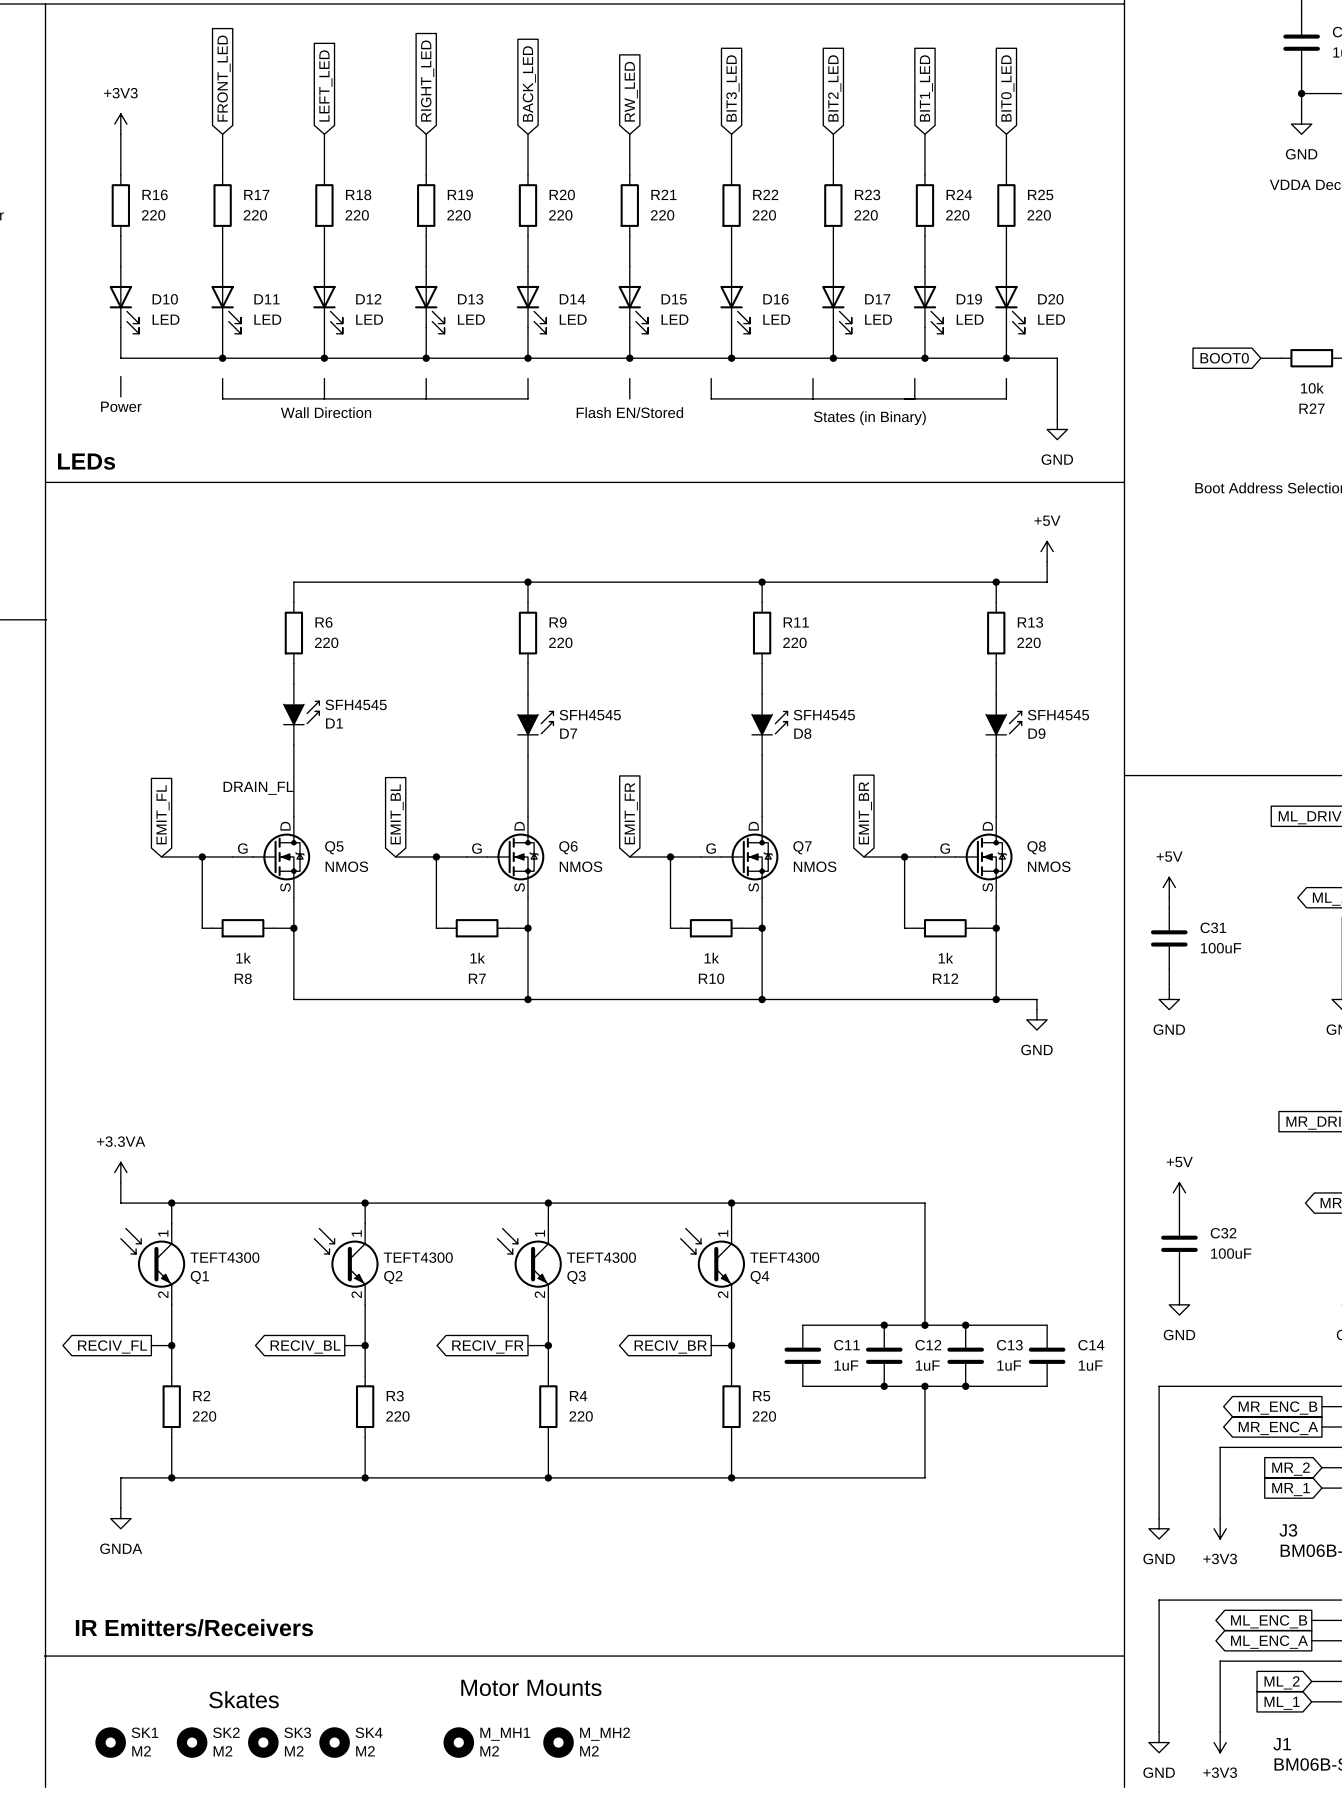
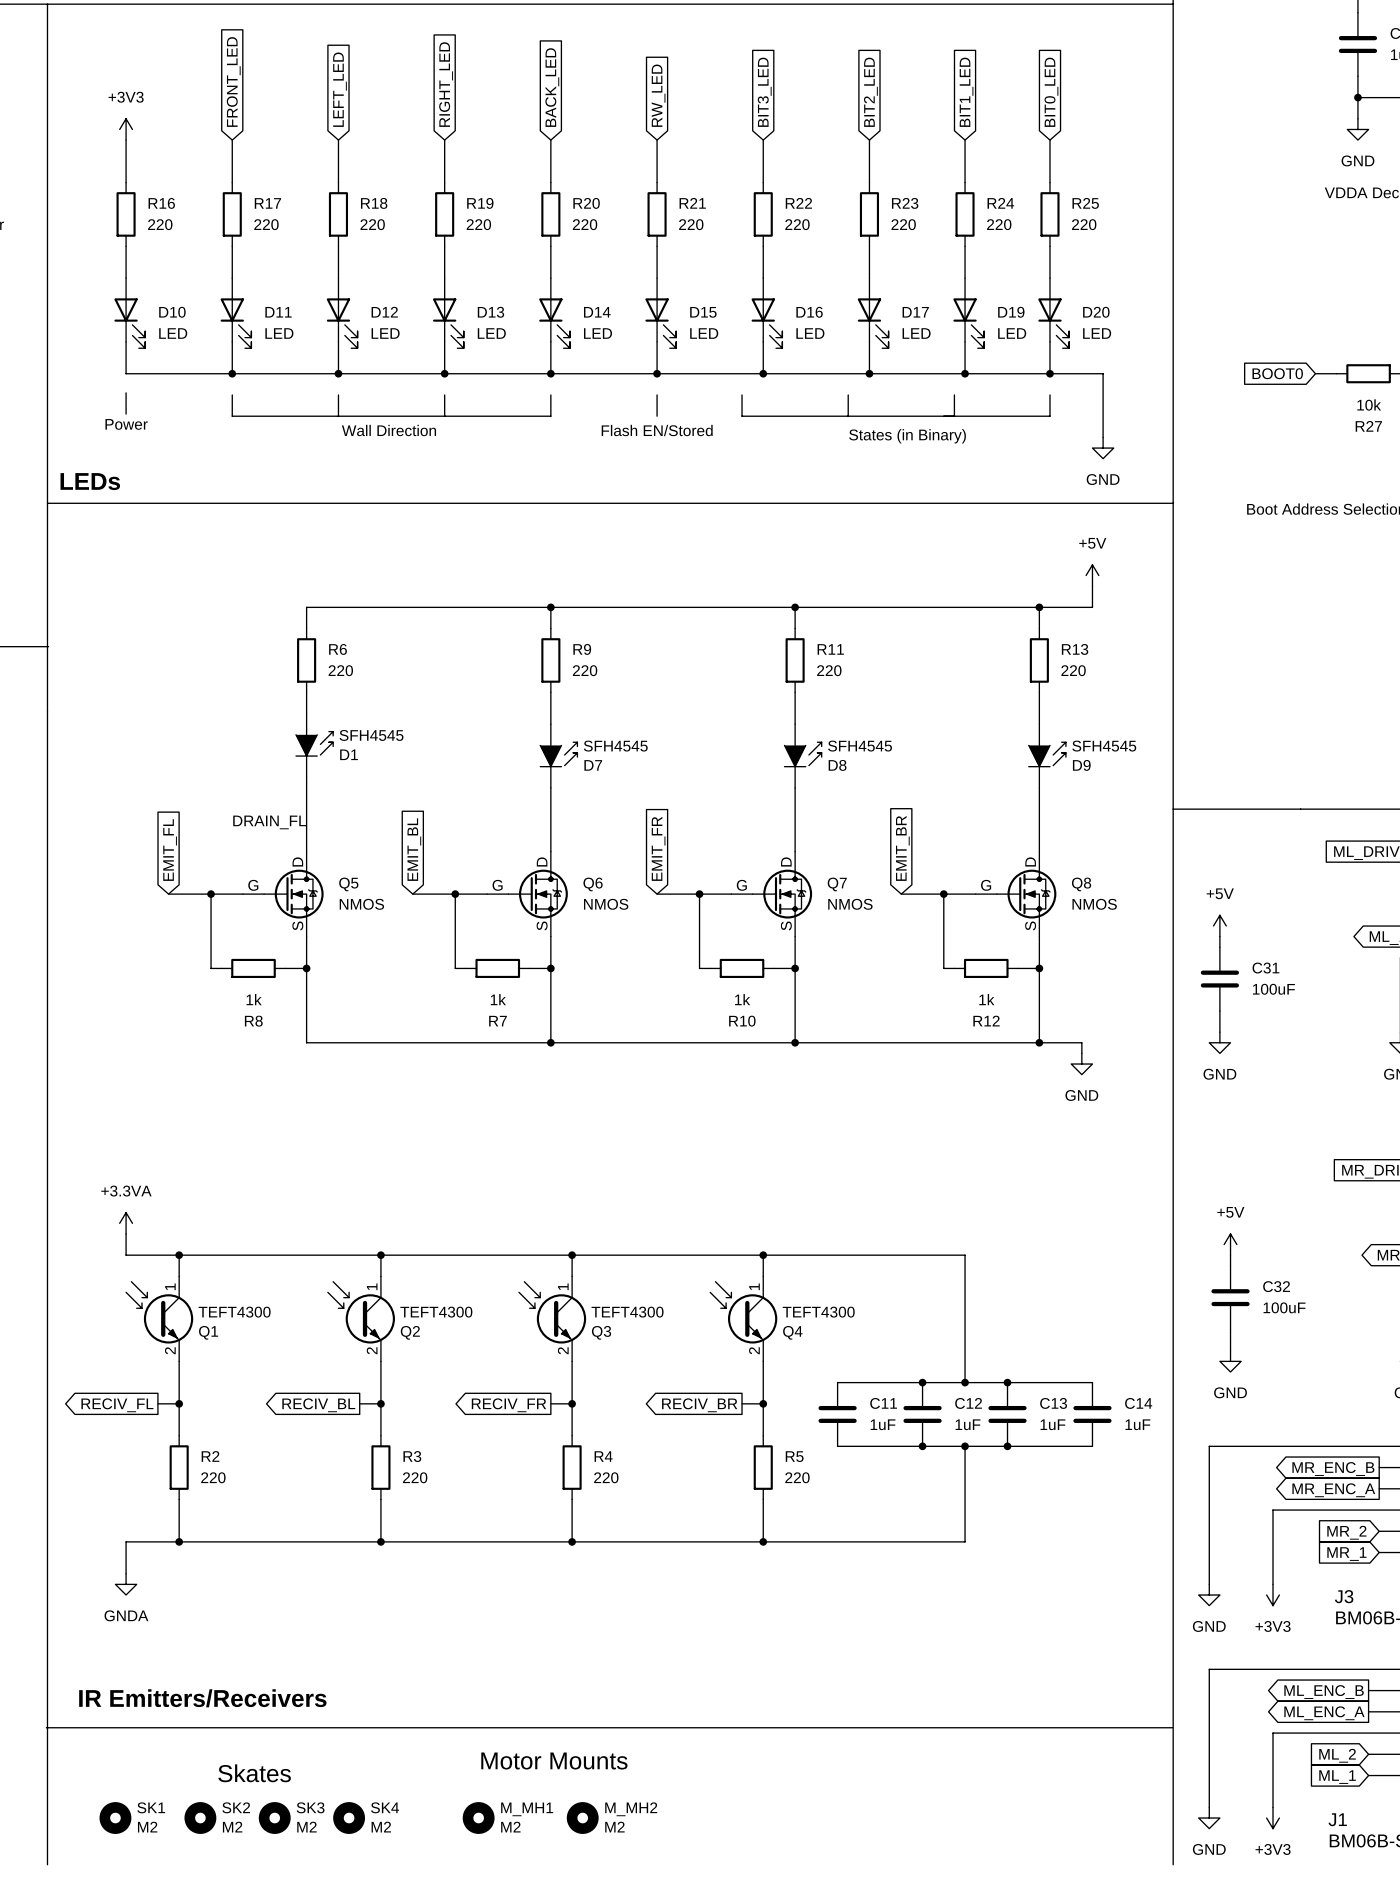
text position: Wall Direction (326, 412) -> Wall Direction (388, 430)

